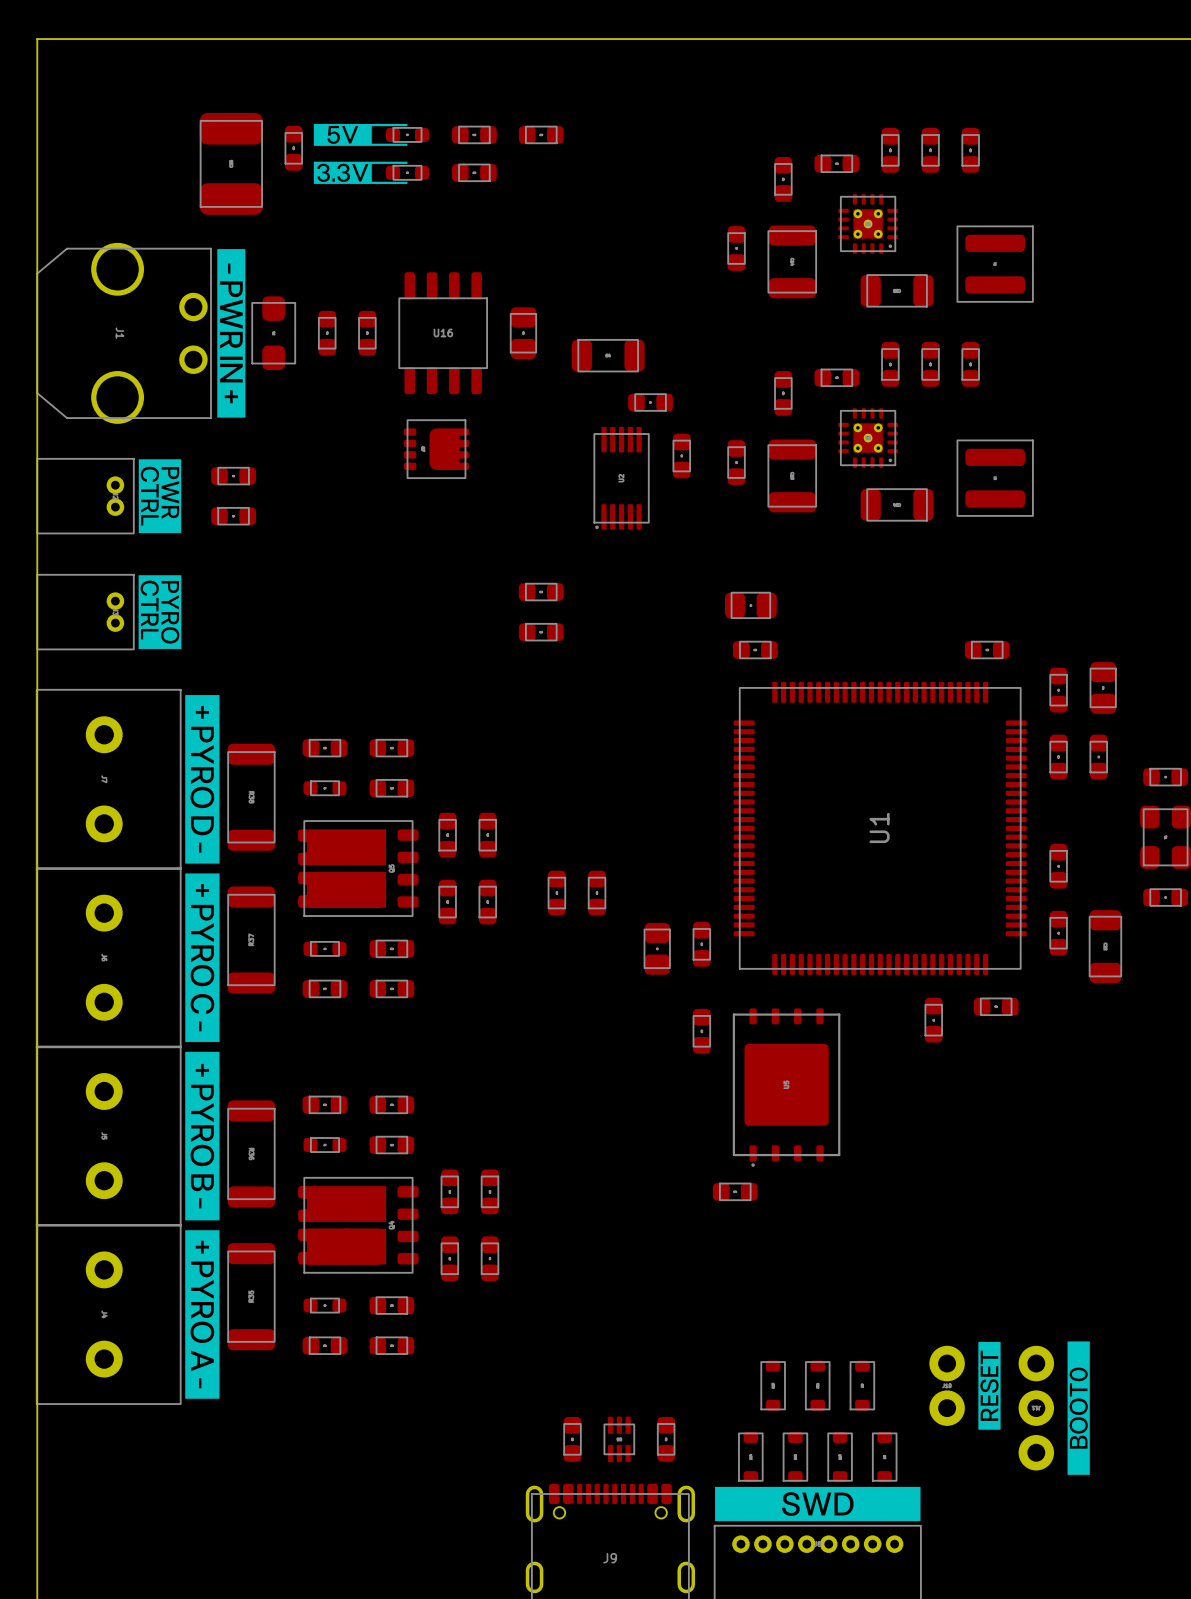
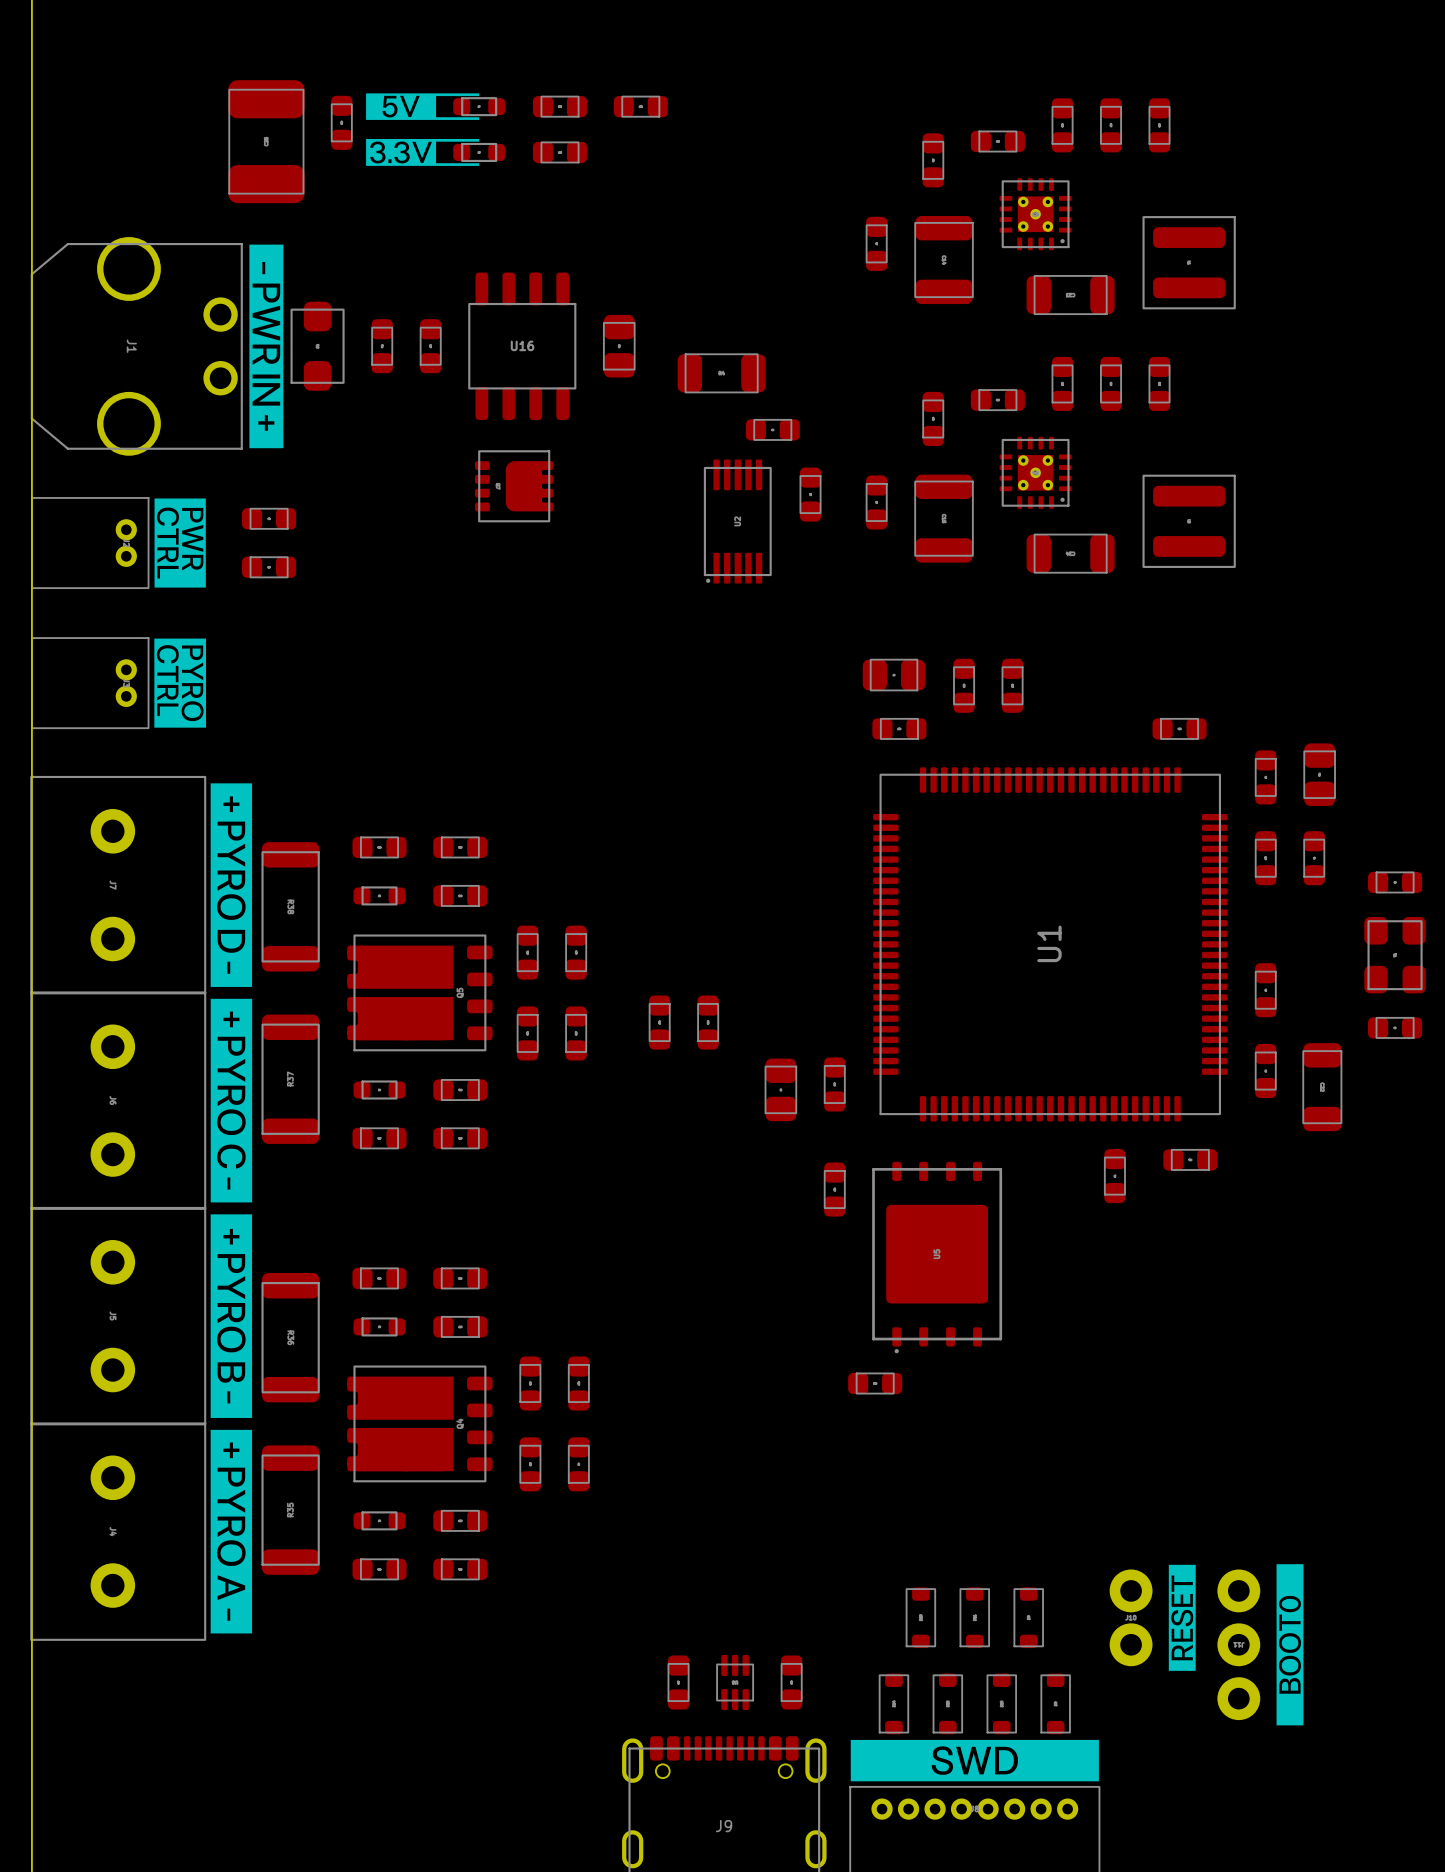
part rotation: 0° (541, 592) -> 90° clockwise (1012, 685)
part position: (541, 592) -> (1012, 685)
part rotation: 0° (541, 632) -> 90° clockwise (964, 685)
part position: (541, 632) -> (964, 685)

